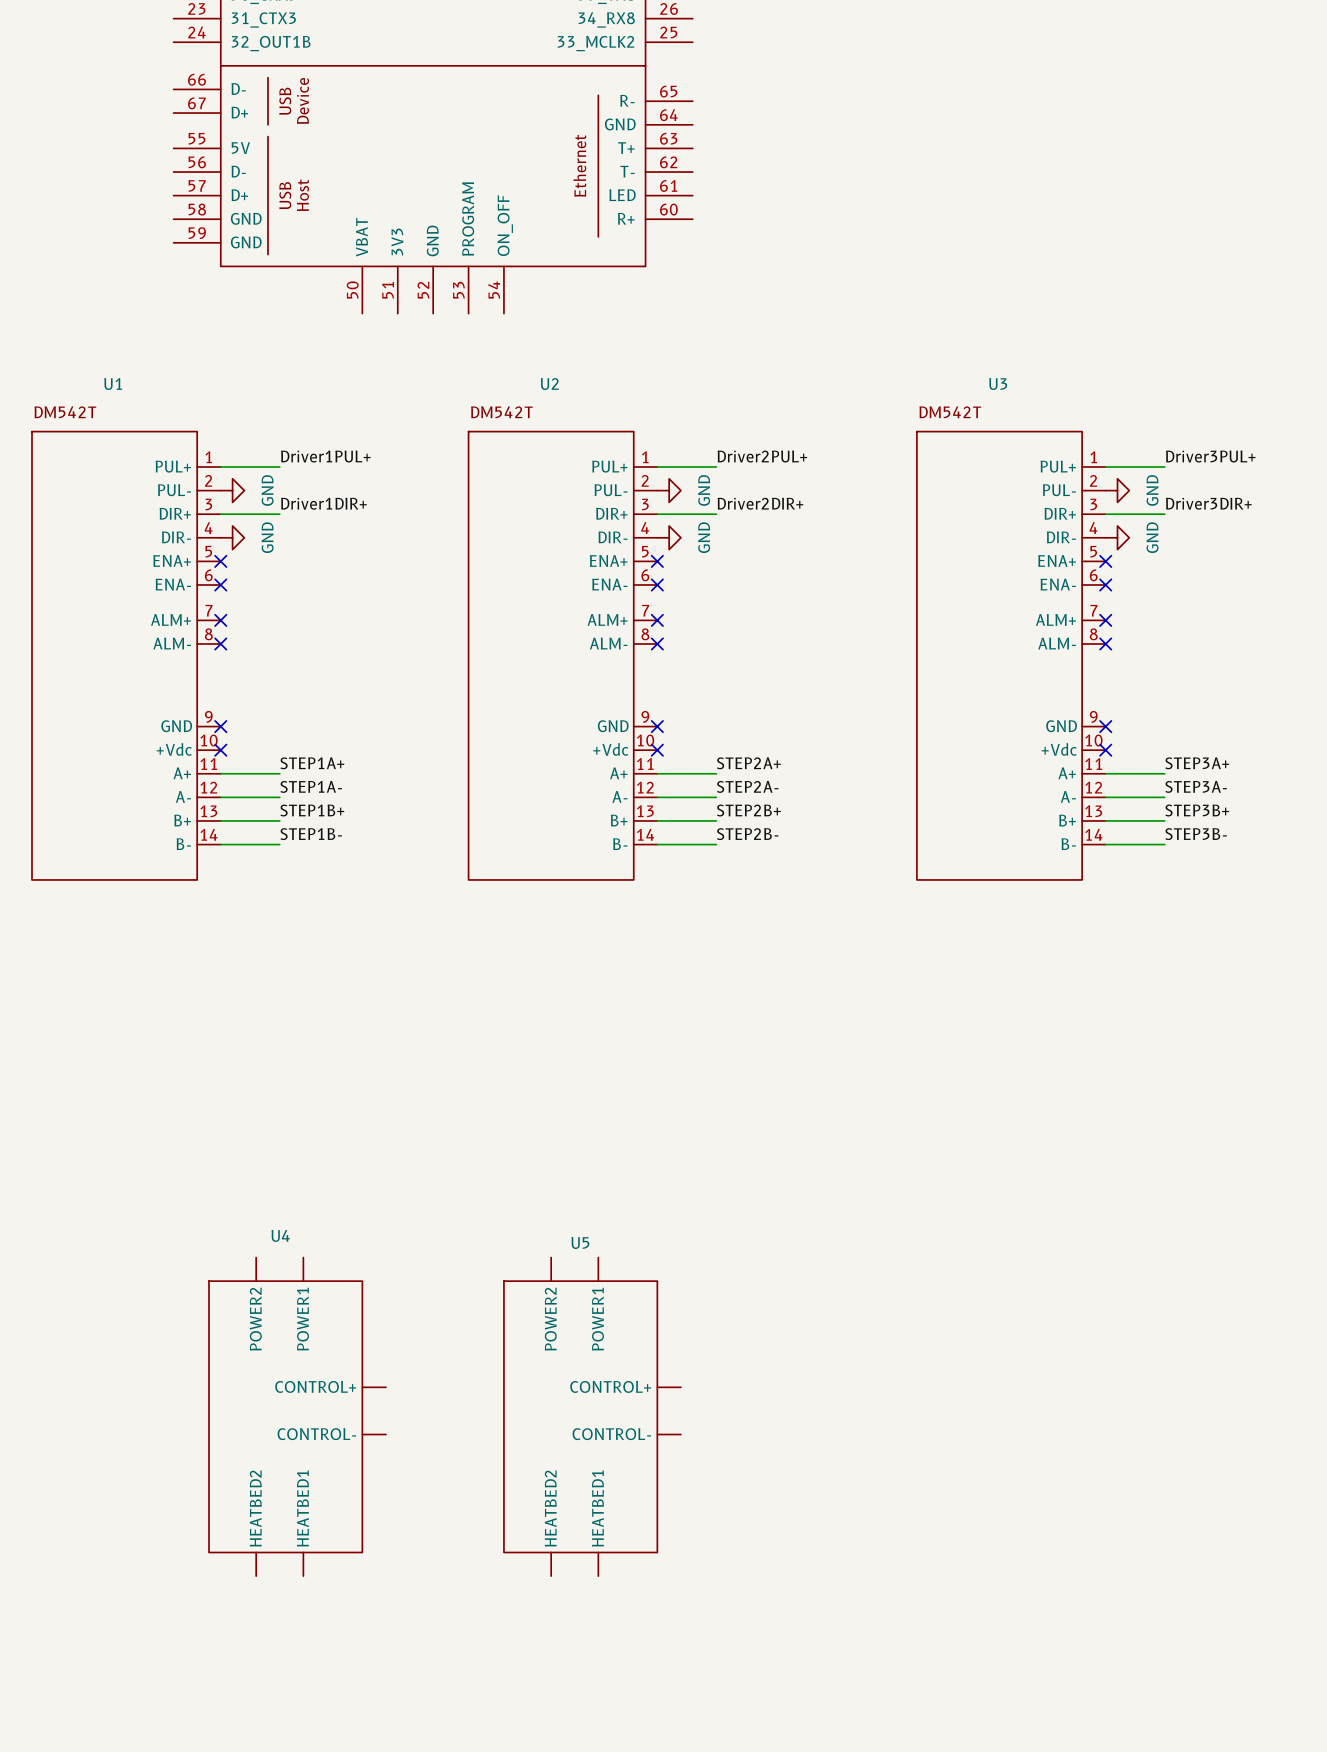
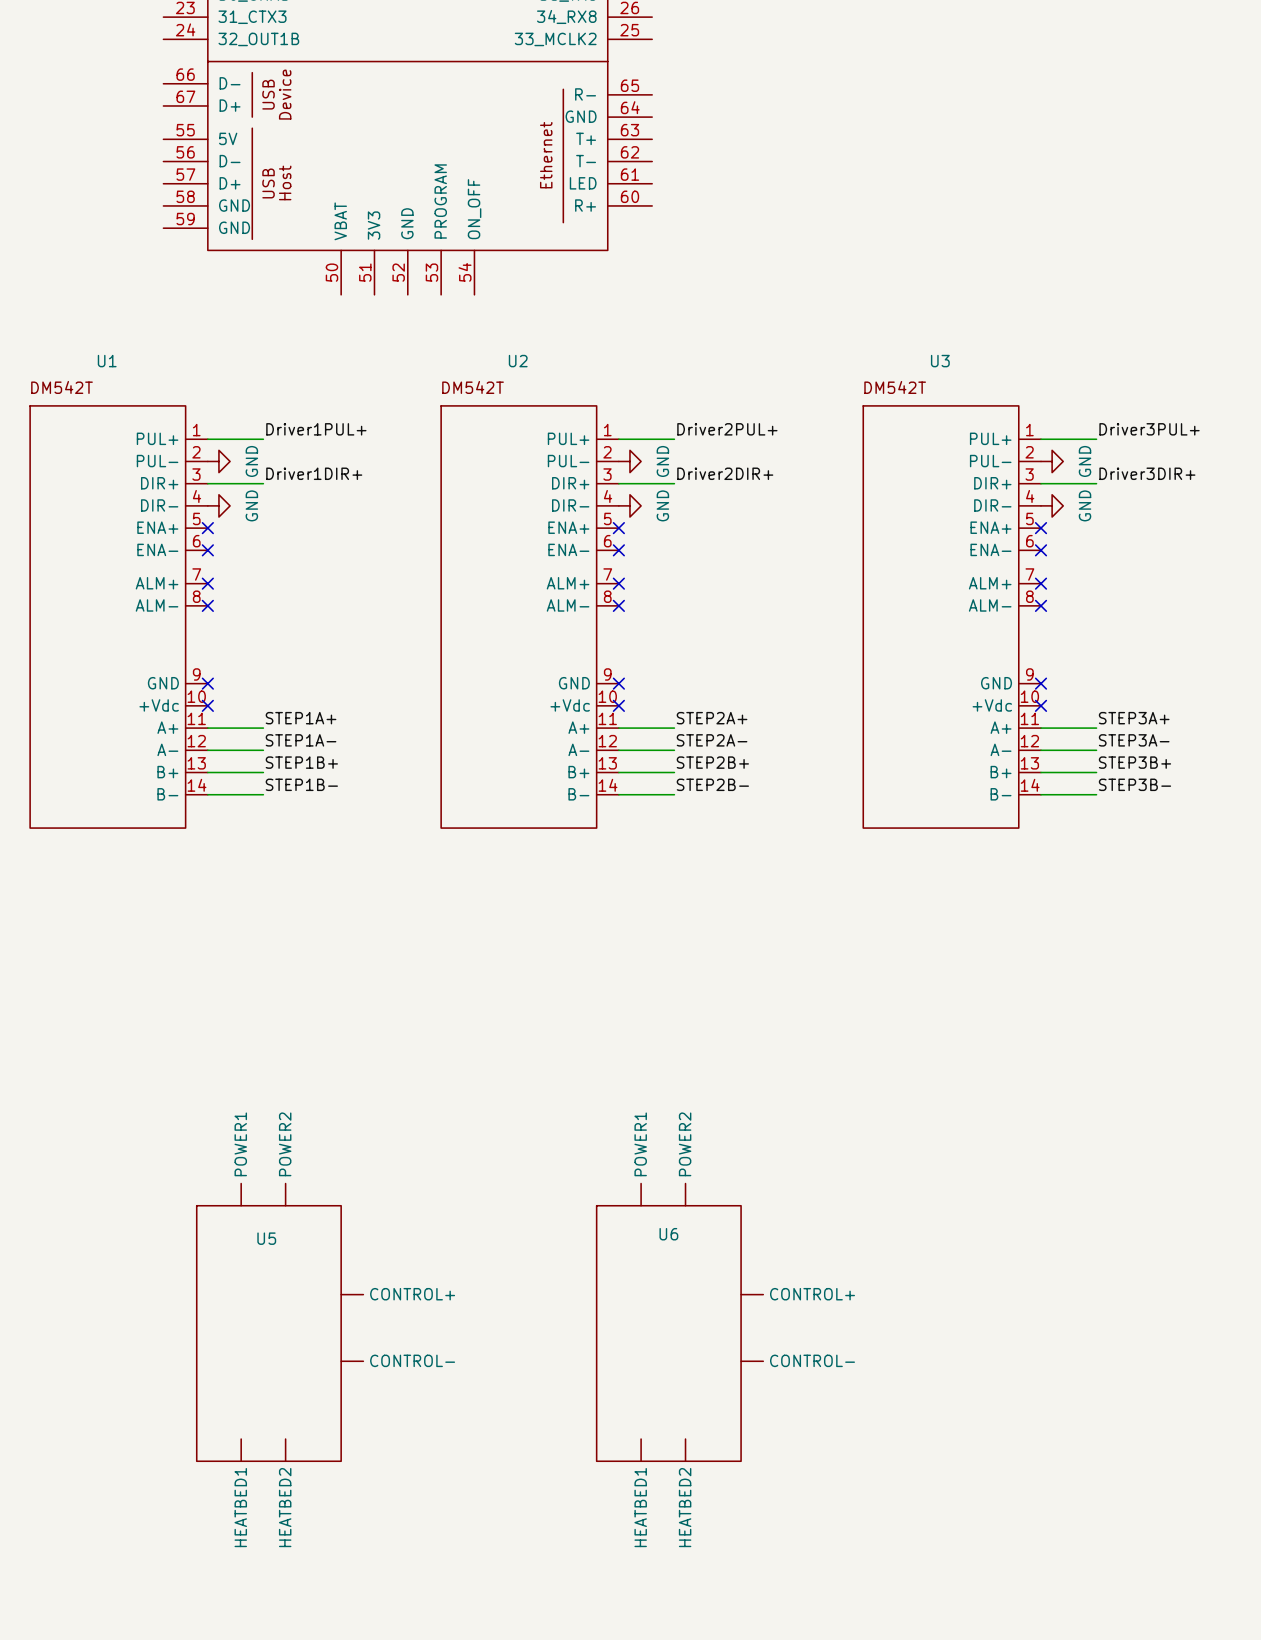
U5 name position: U5 (580, 1242) -> U5 (266, 1238)
U5 symbol: [503, 1257, 681, 1577] -> [196, 1183, 364, 1462]
U6: none -> (679, 1322)
U4: (297, 1416) -> none

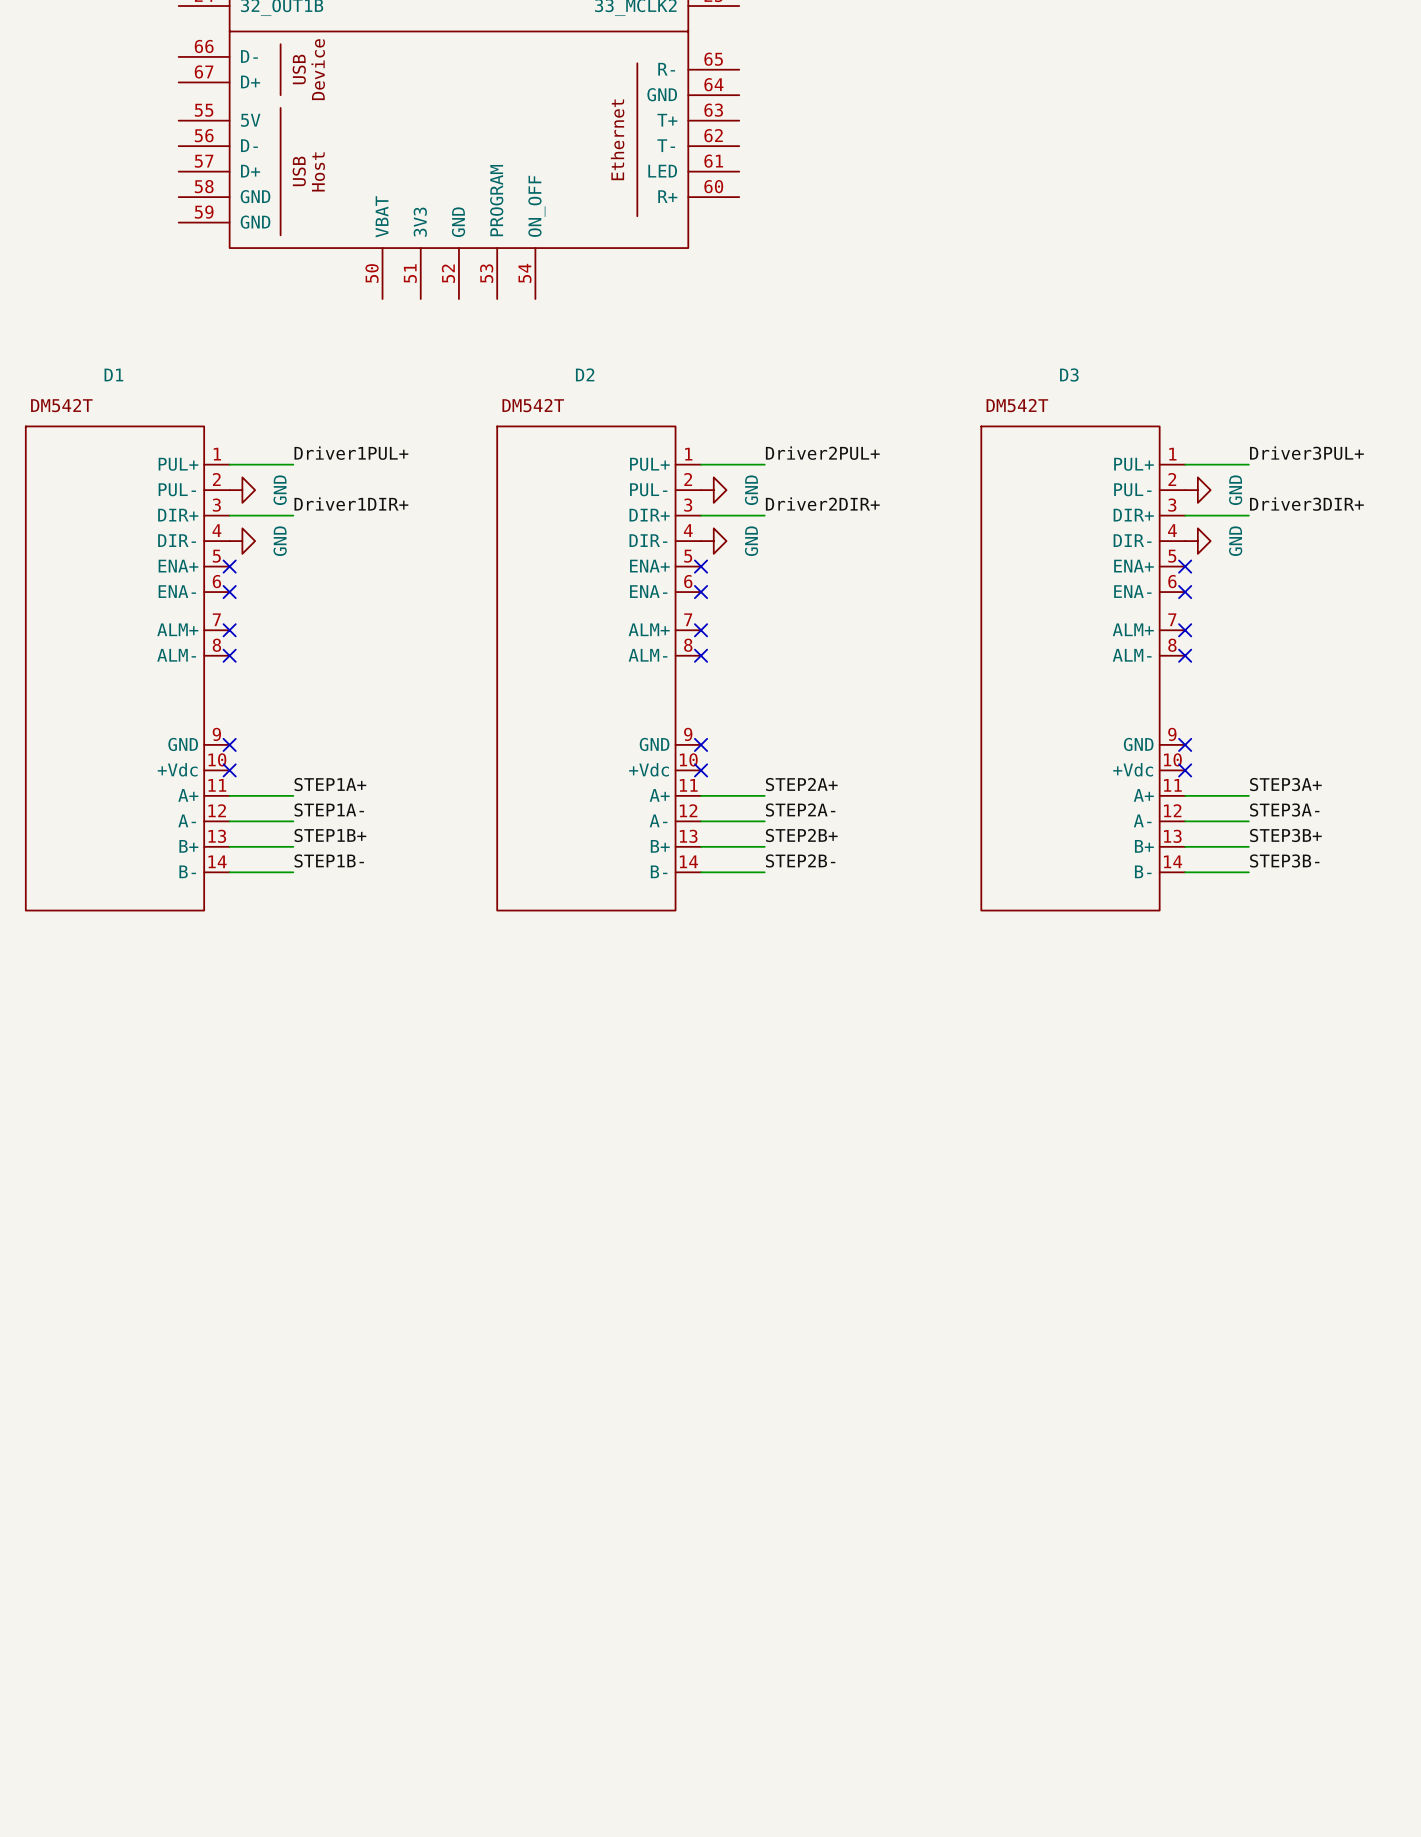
part value: U1 (107, 361) -> D1 (113, 374)
part value: U2 (518, 361) -> D2 (585, 374)
part value: U3 (940, 361) -> D3 (1069, 375)
U5: (280, 1322) -> none
U6: (679, 1322) -> none

